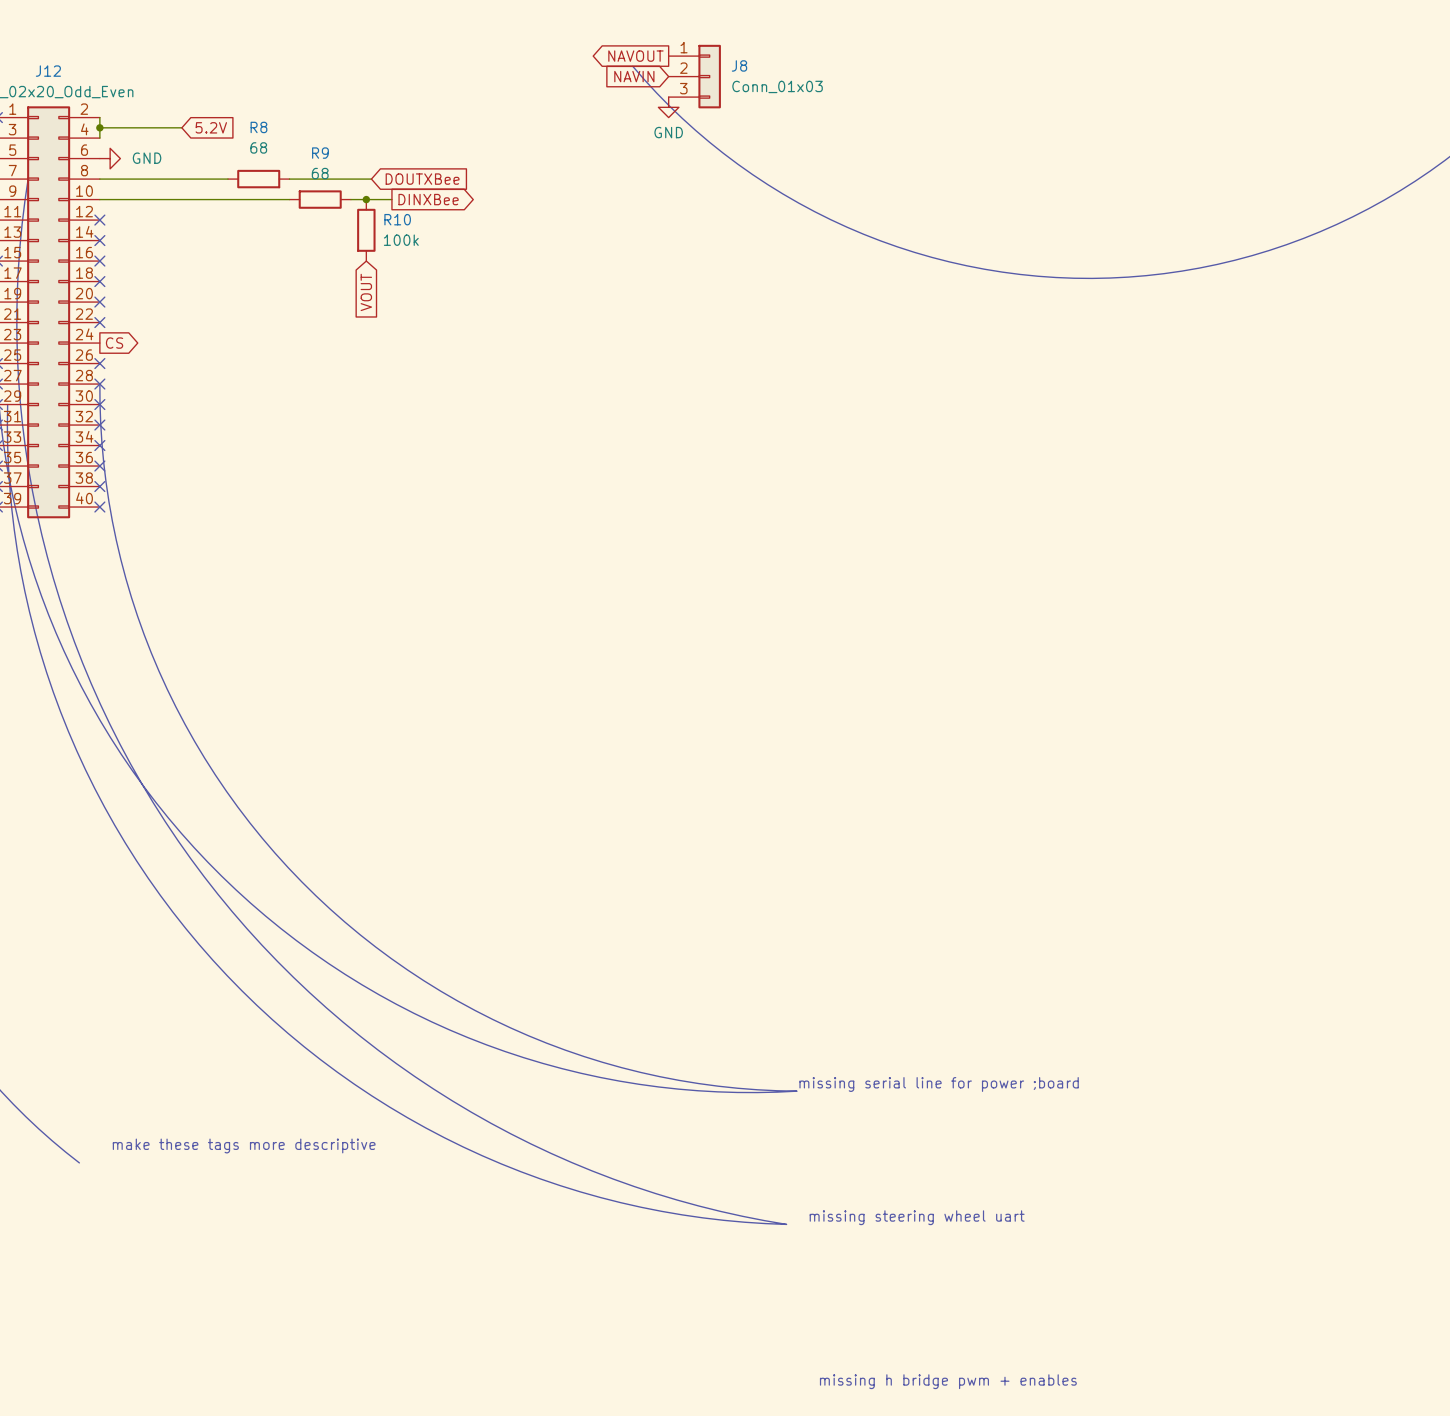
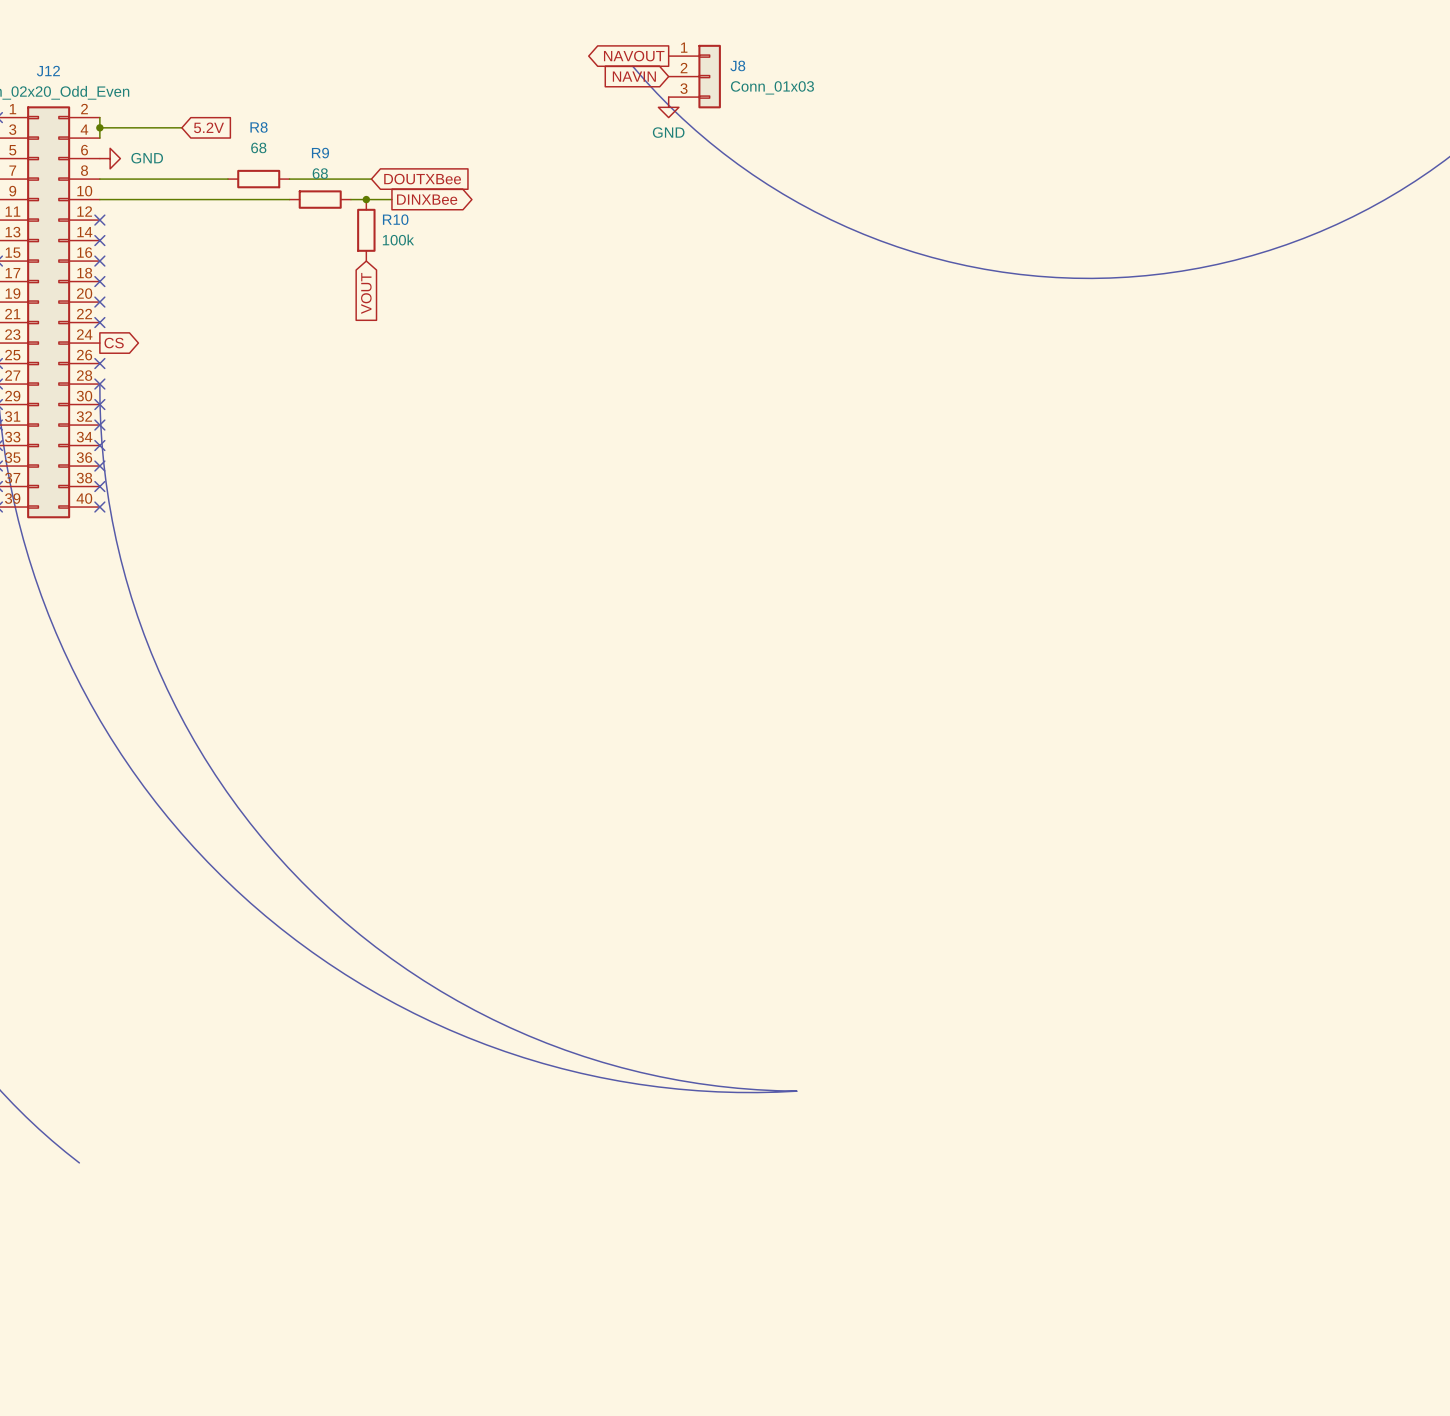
line: (28, 179) (18, 268) (17, 357) (25, 447) (41, 535) (66, 621) (100, 704) (141, 783) (190, 858) (246, 928) (309, 992) (378, 1050) (452, 1100) (530, 1143) (613, 1179) (698, 1206) (786, 1224) (703, 1217) (620, 1202) (540, 1178) (482, 1155) (407, 1117) (354, 1084) (288, 1033) (227, 975) (172, 912) (136, 860) (94, 788) (60, 712) (40, 652) (20, 571) (9, 488) (7, 404) -> none
text: missing serial line for power ;board (939, 1084) -> none
text: make these tags more descriptive (244, 1145) -> none
text: missing steering wheel uart (917, 1217) -> none
text: missing h bridge pwm + enables (948, 1381) -> none

